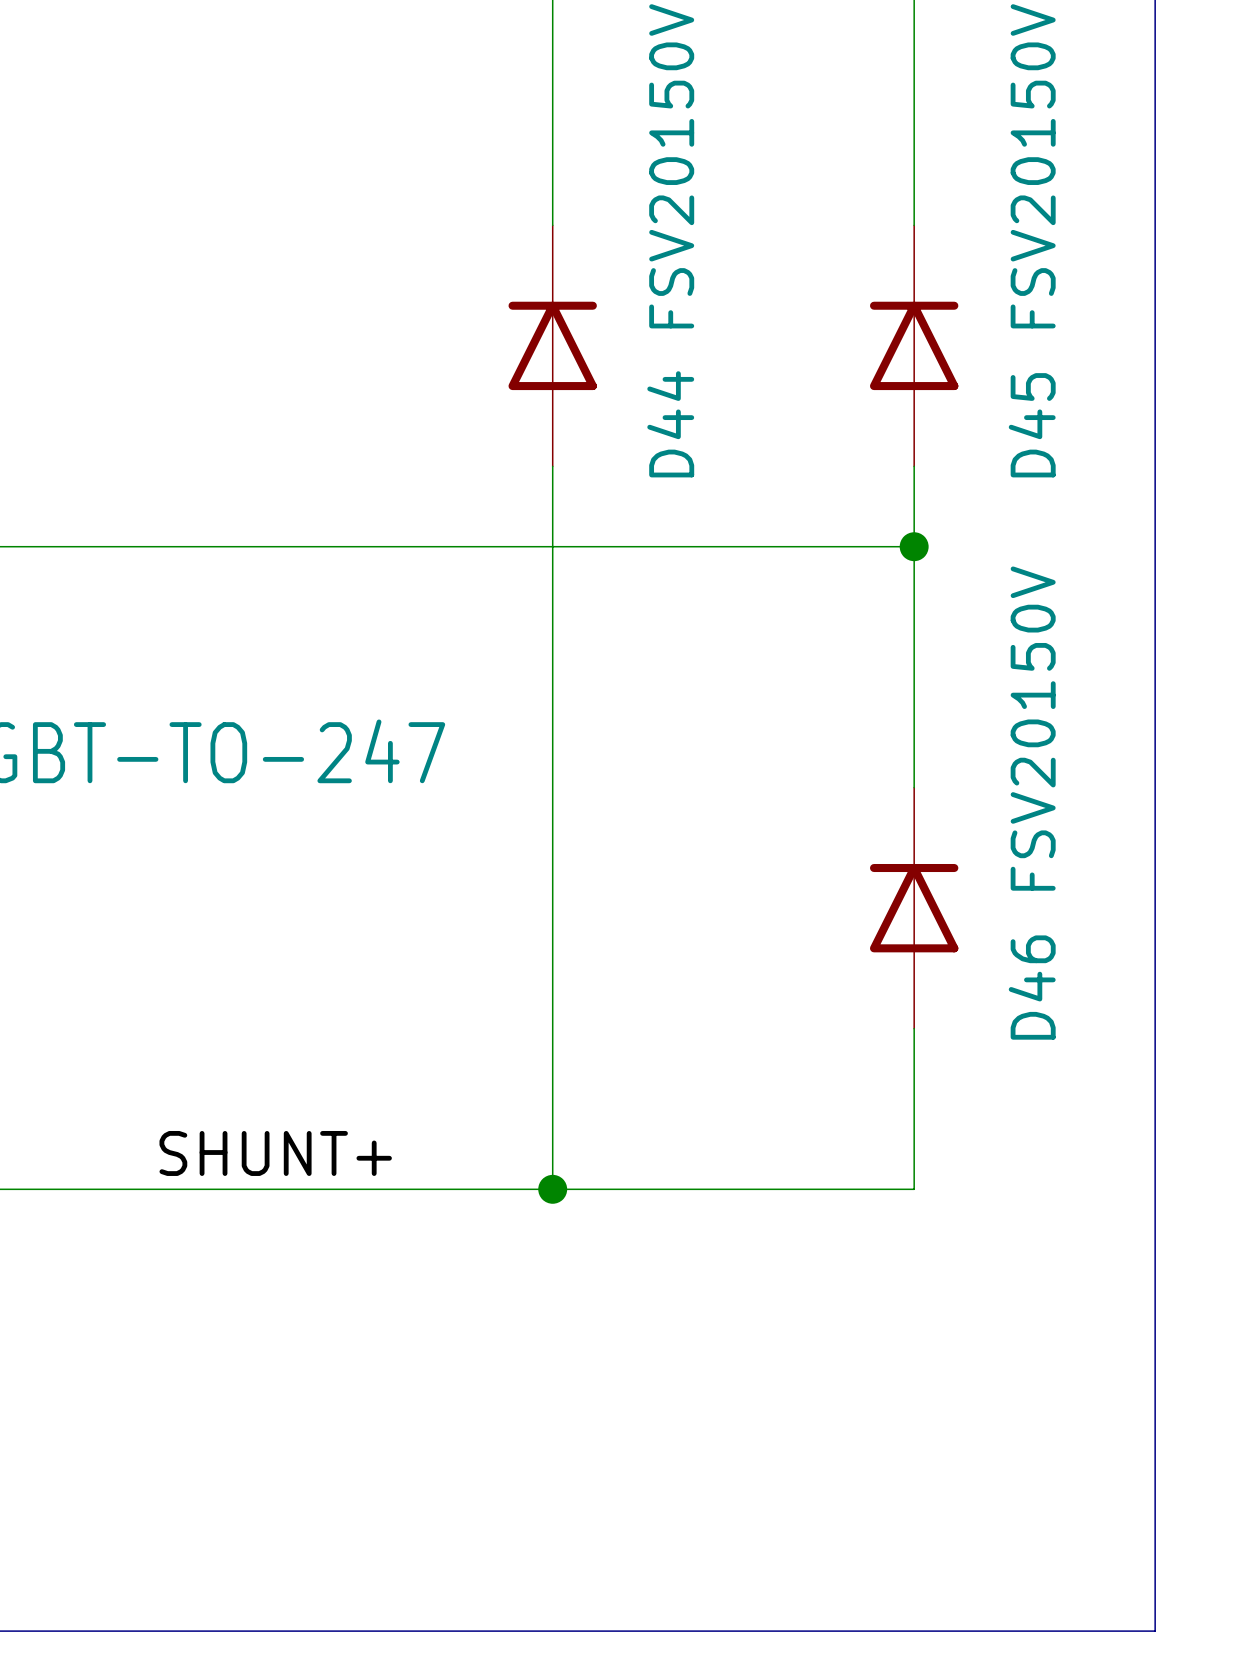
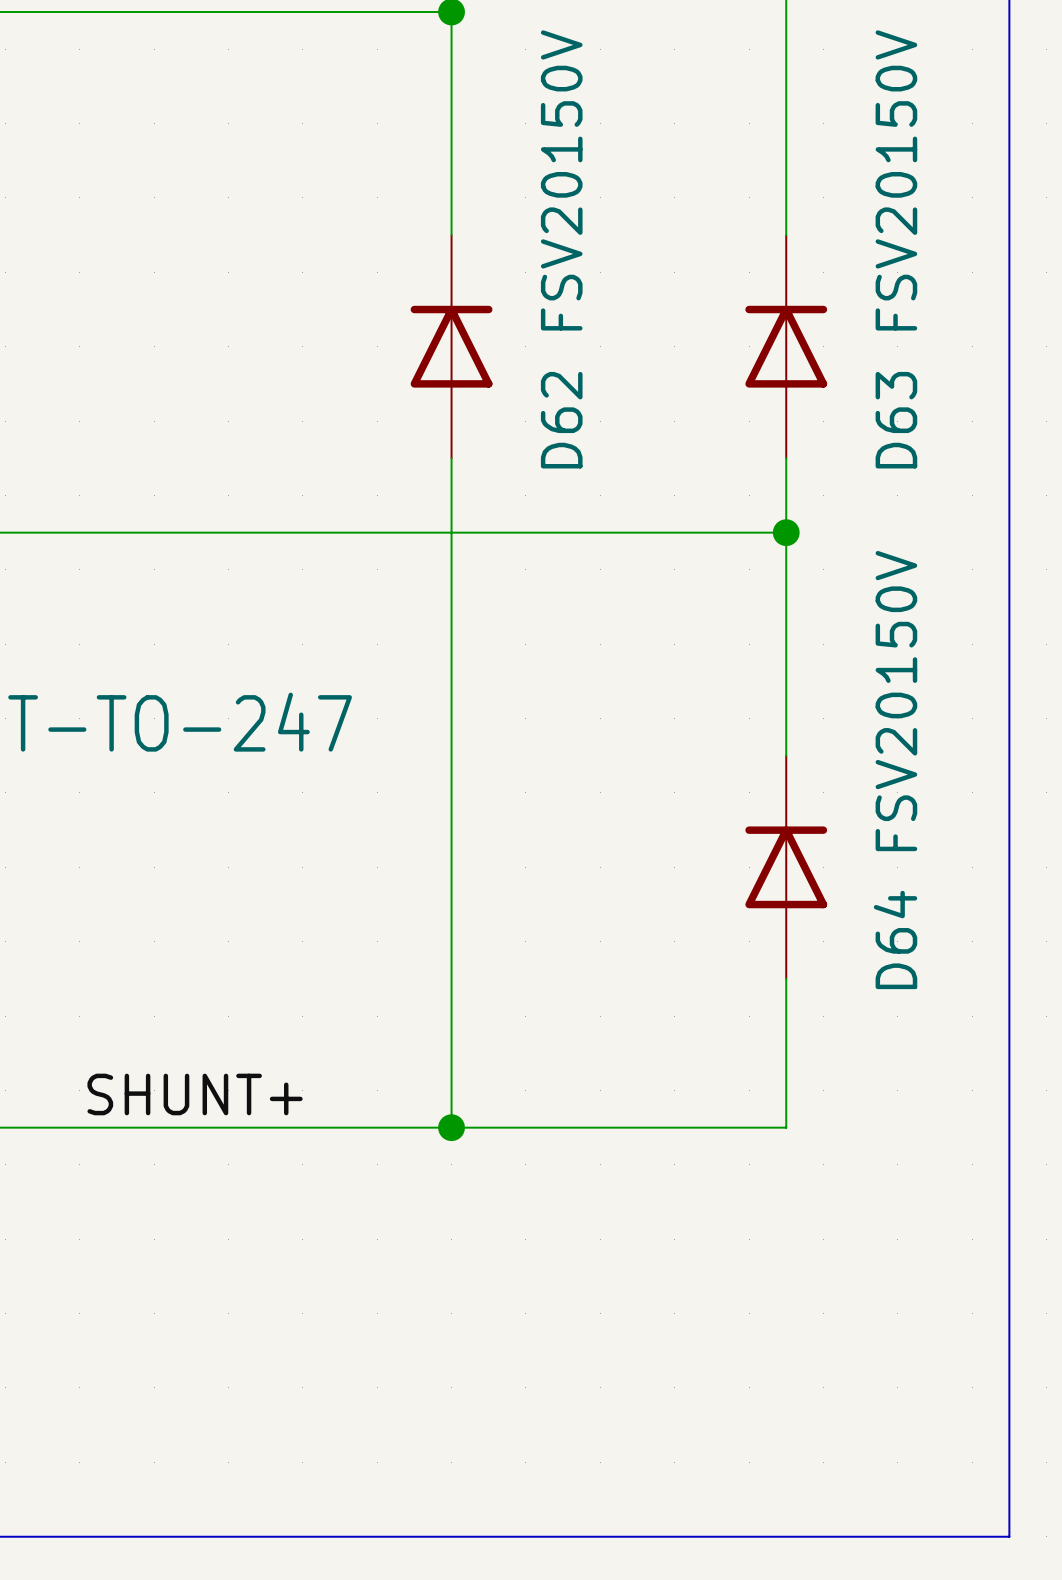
D44 name: D44 (670, 424) -> D62 (561, 420)
D45 name: D45 (1032, 425) -> D63 (896, 420)
D46 name: D46 (1032, 987) -> D64 (895, 939)

